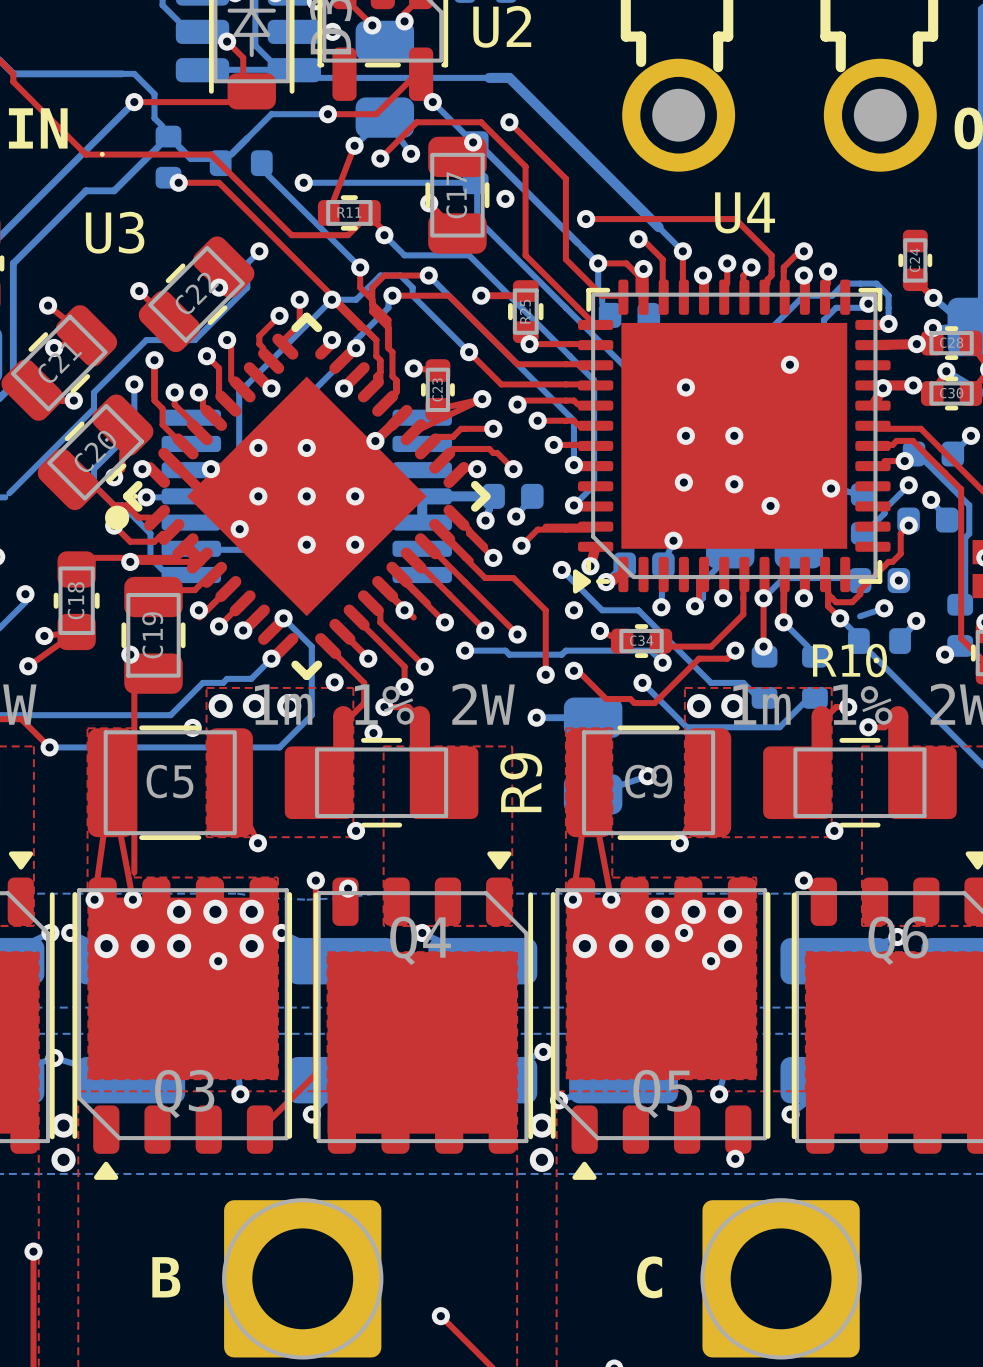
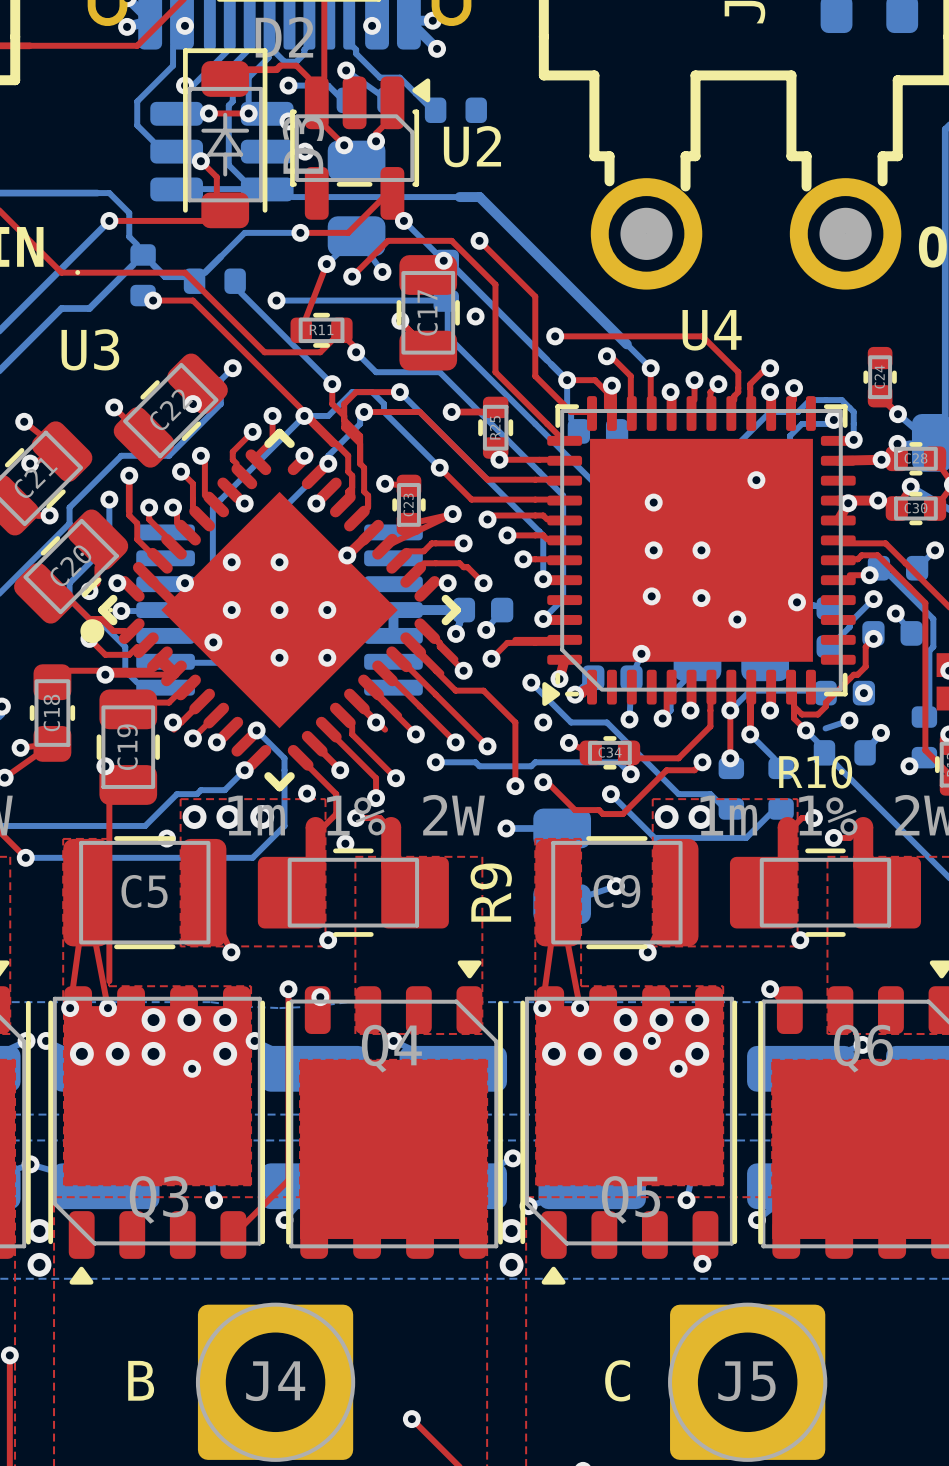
B text: none -> B (141, 1380)
B name: B (166, 1277) -> J4 (275, 1381)
C text: none -> C (617, 1380)
C name: C (649, 1277) -> J5 (746, 1381)

